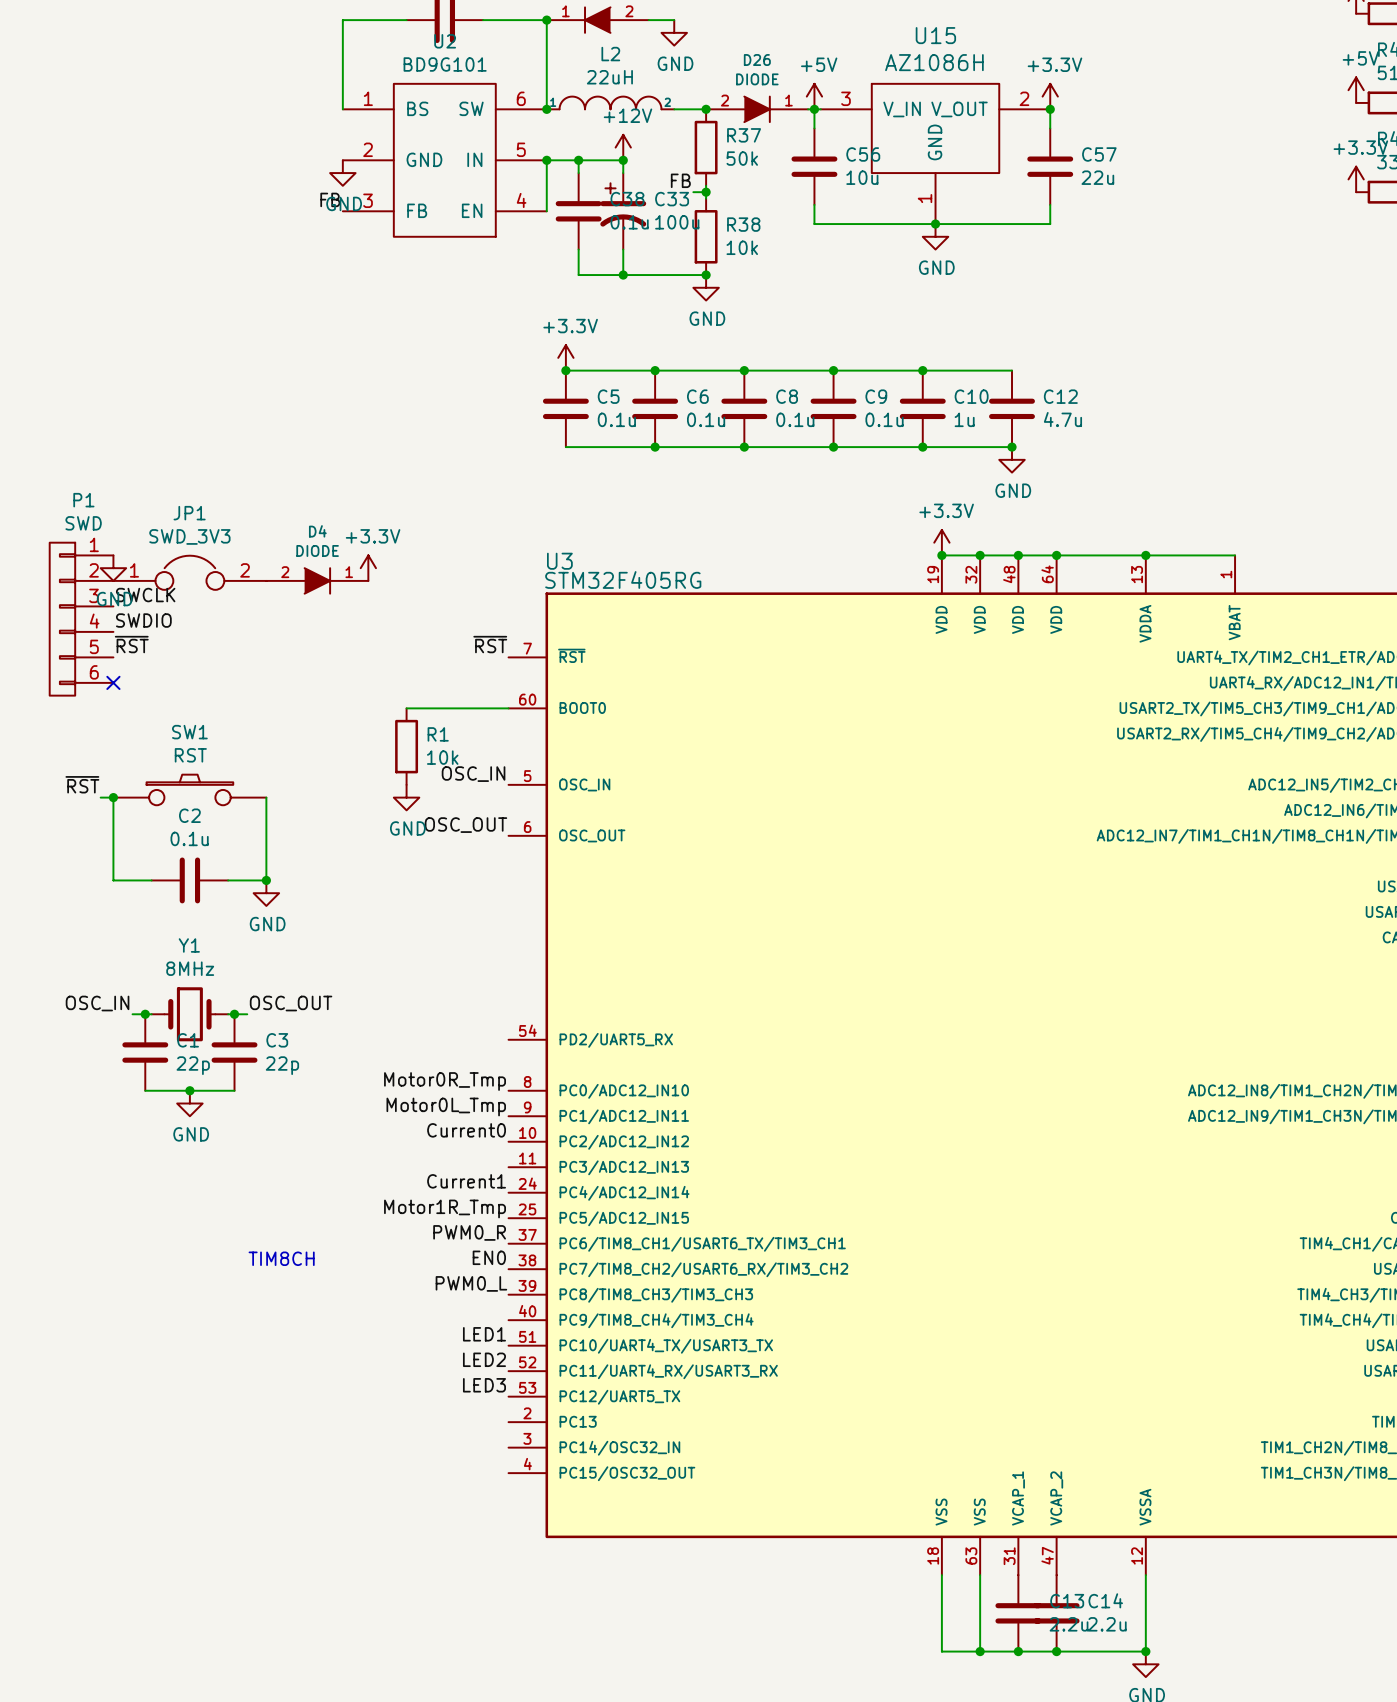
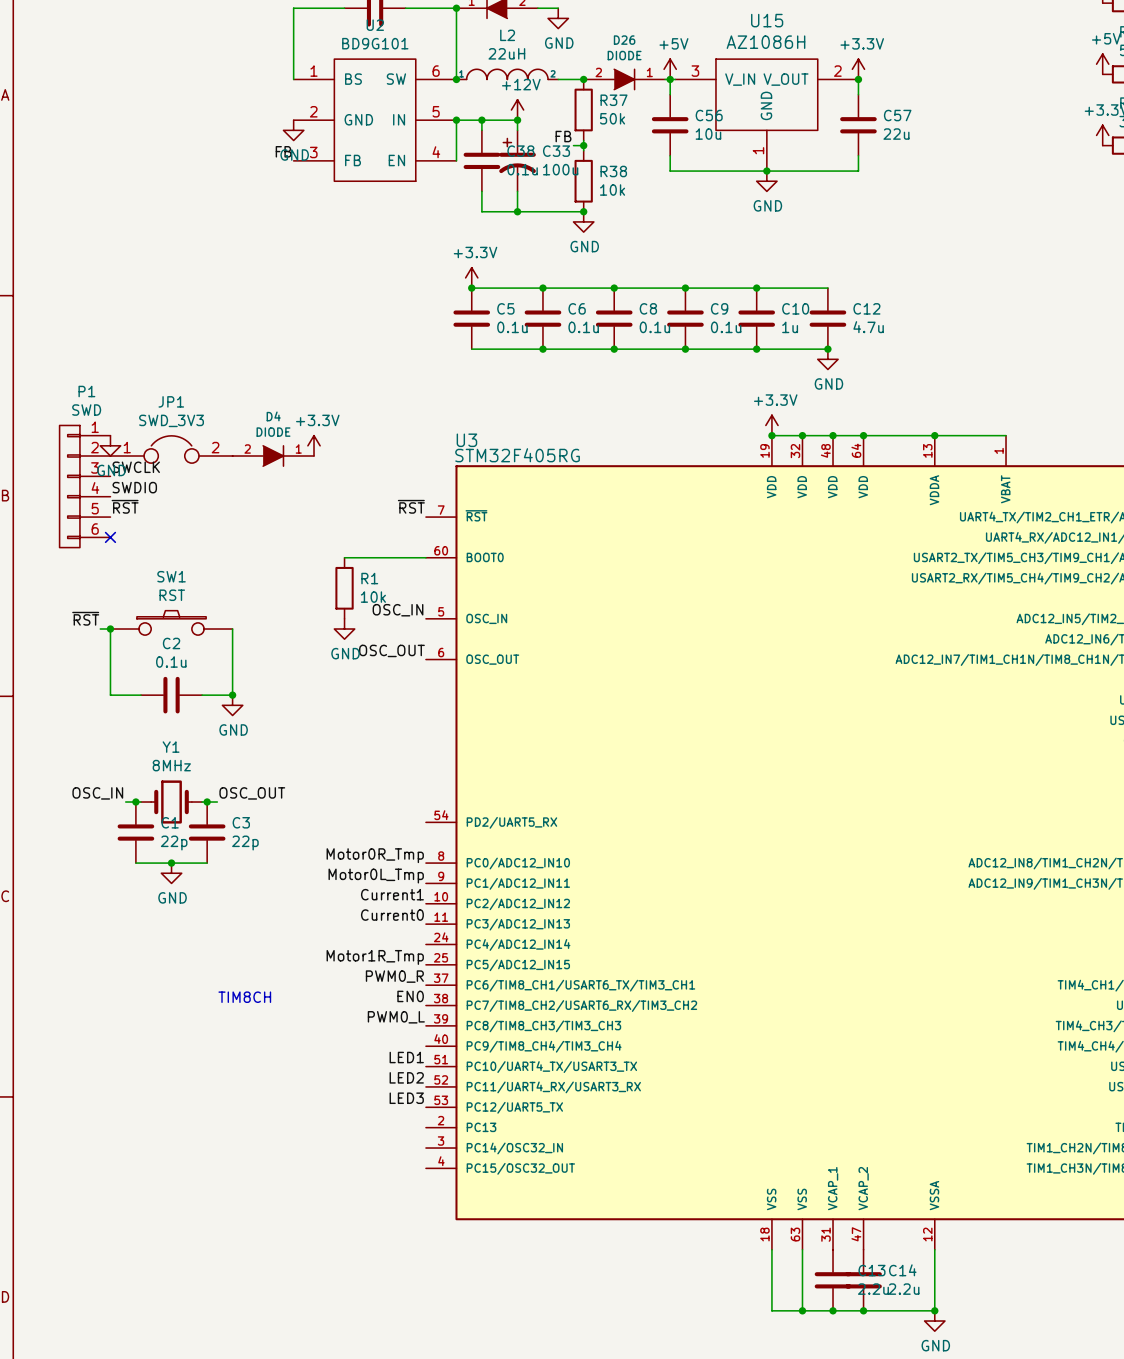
label: Current0 (466, 1130) -> Current1 (392, 894)
label: Current1 (466, 1181) -> Current0 (392, 915)

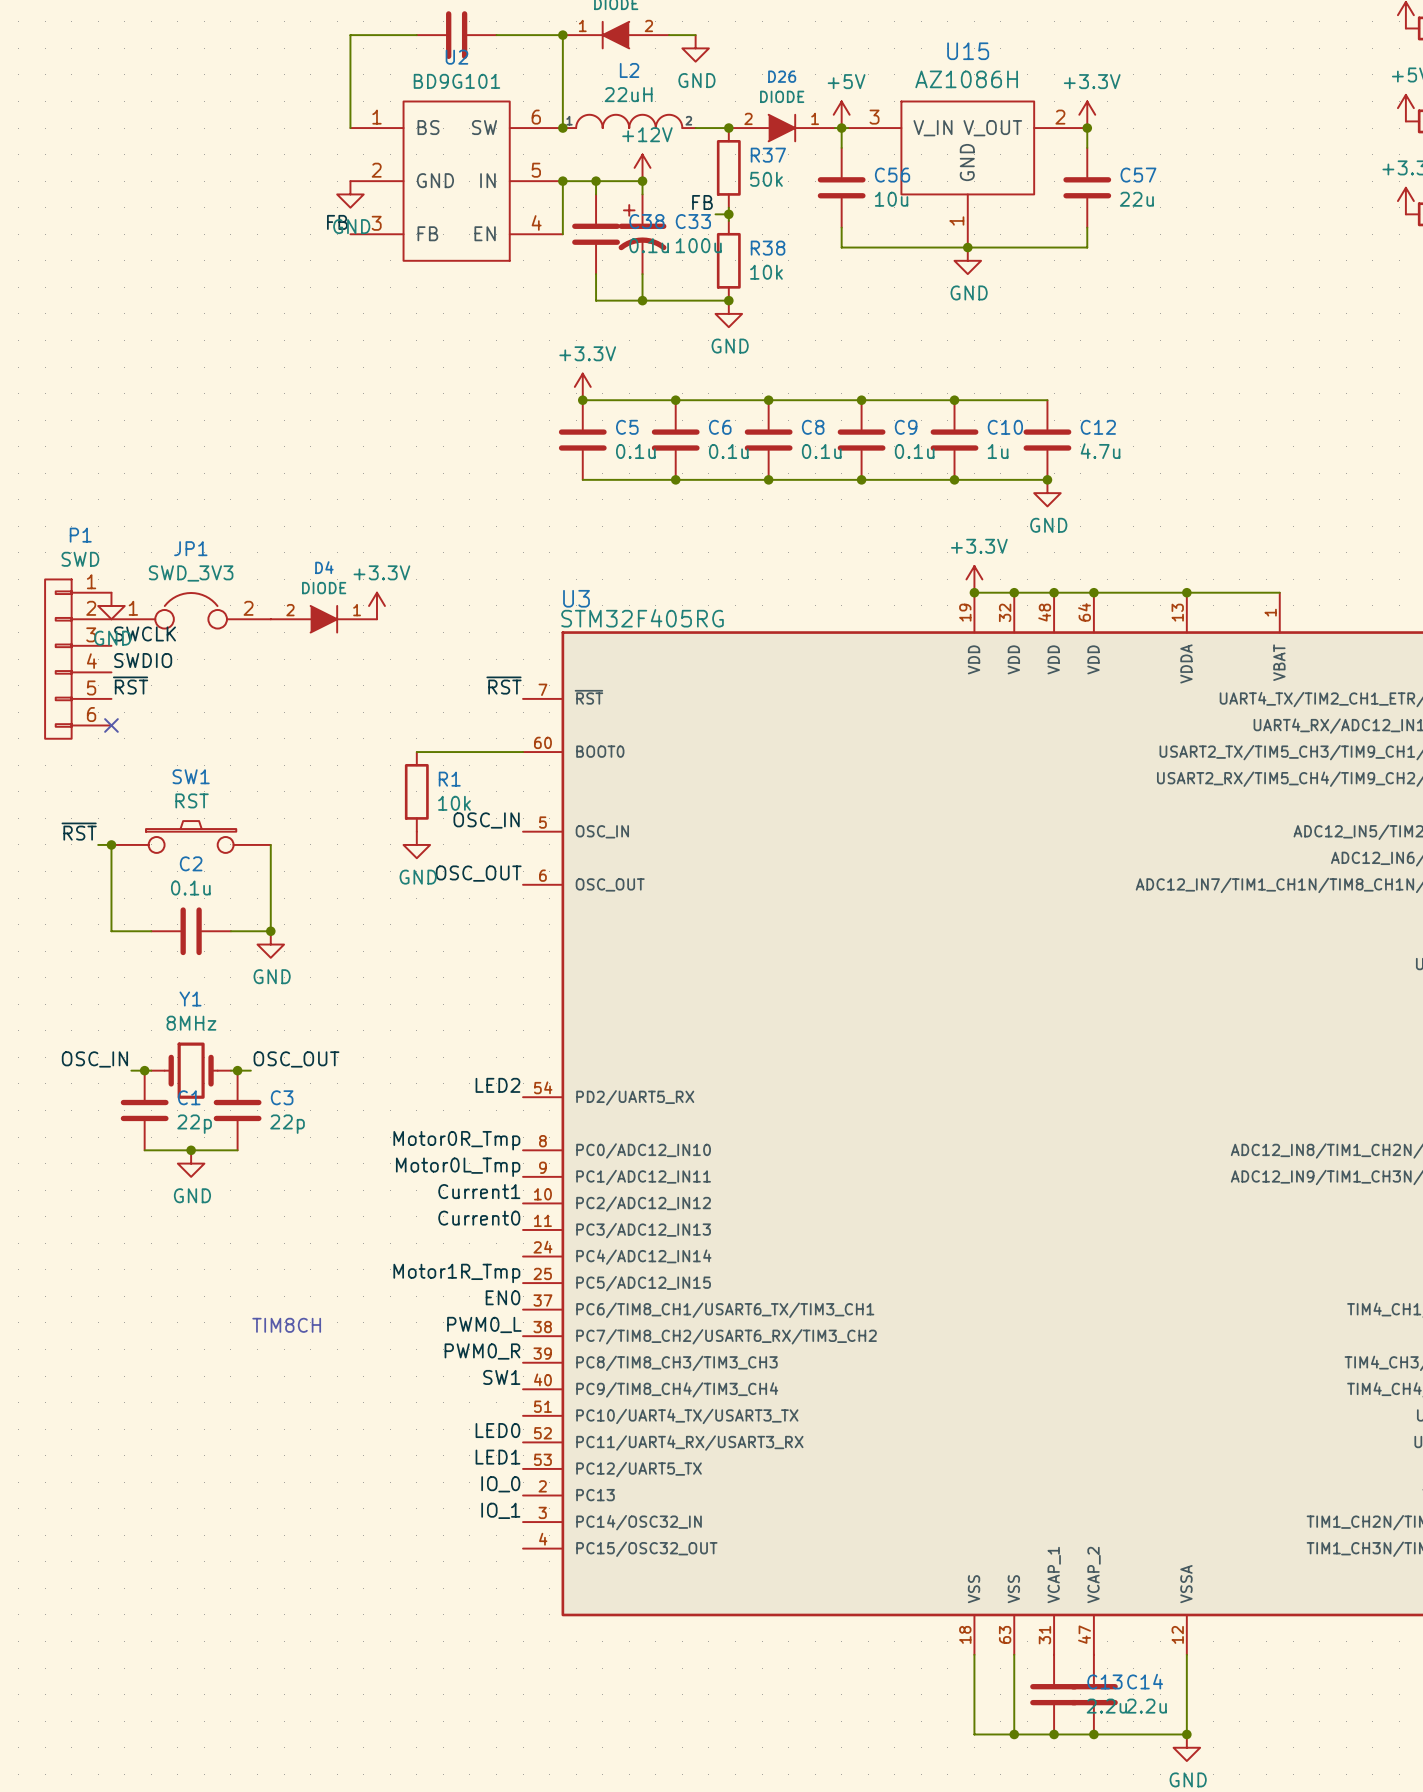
label: none -> LED2 (497, 1085)
label: PWM0_R (394, 976) -> EN0 (503, 1297)
label: EN0 (410, 996) -> PWM0_L (484, 1324)
label: PWM0_L (396, 1017) -> PWM0_R (482, 1351)
label: none -> SW1 (501, 1377)
label: LED1 (406, 1057) -> none
label: LED2 (406, 1077) -> LED0 (497, 1430)
label: LED3 (406, 1098) -> LED1 (497, 1457)
label: none -> IO_0 (500, 1484)
label: none -> IO_1 (500, 1510)

